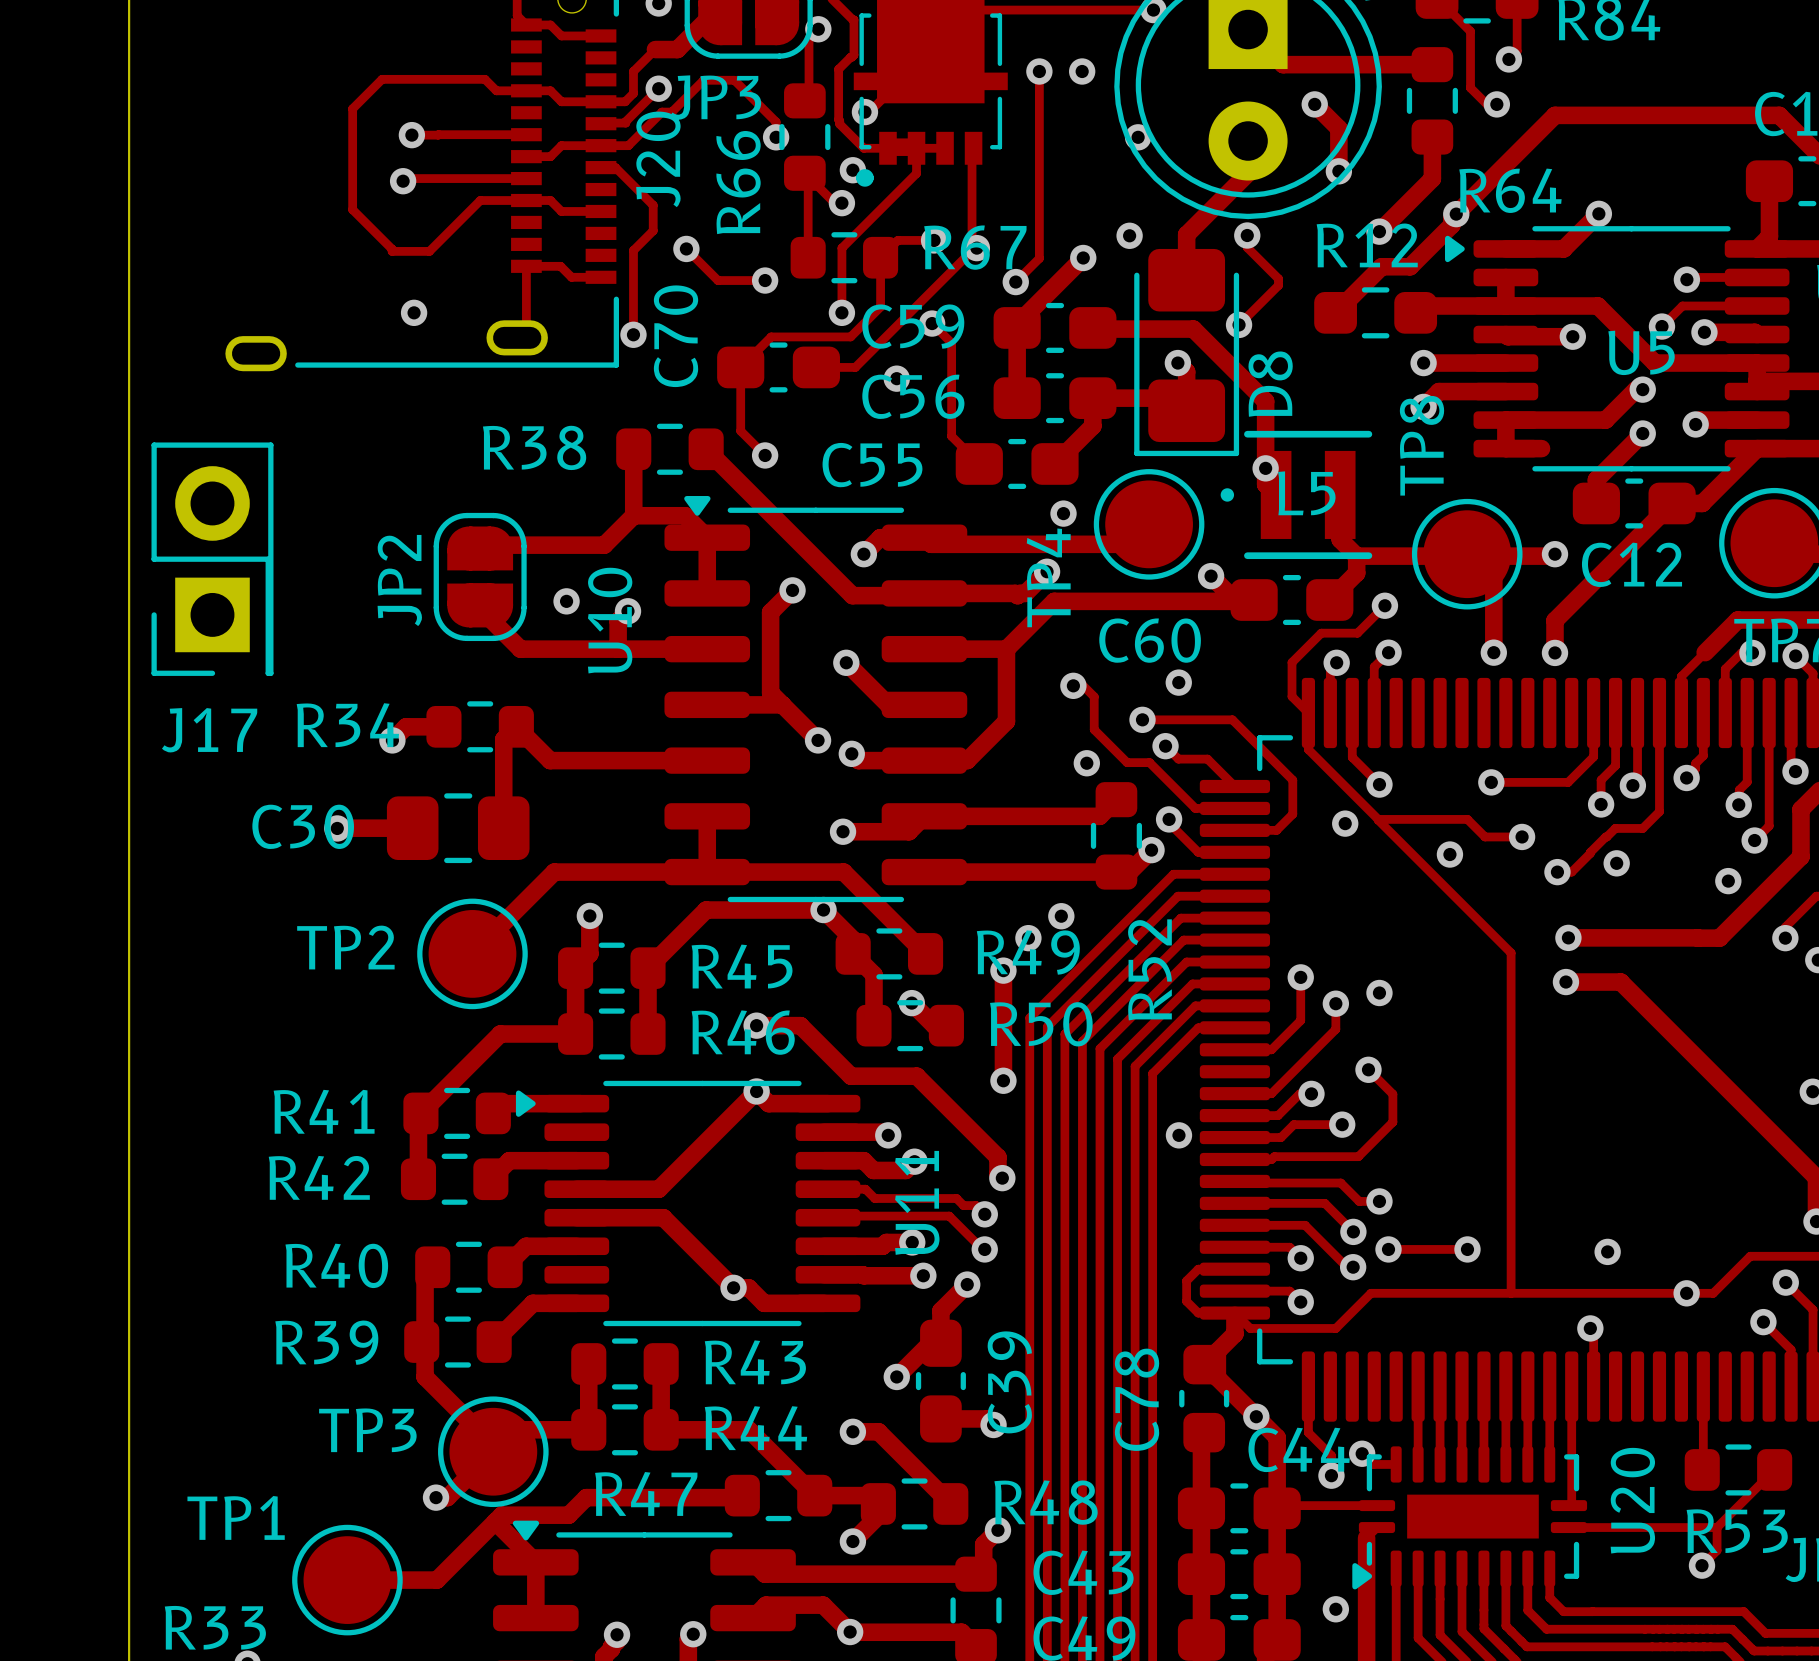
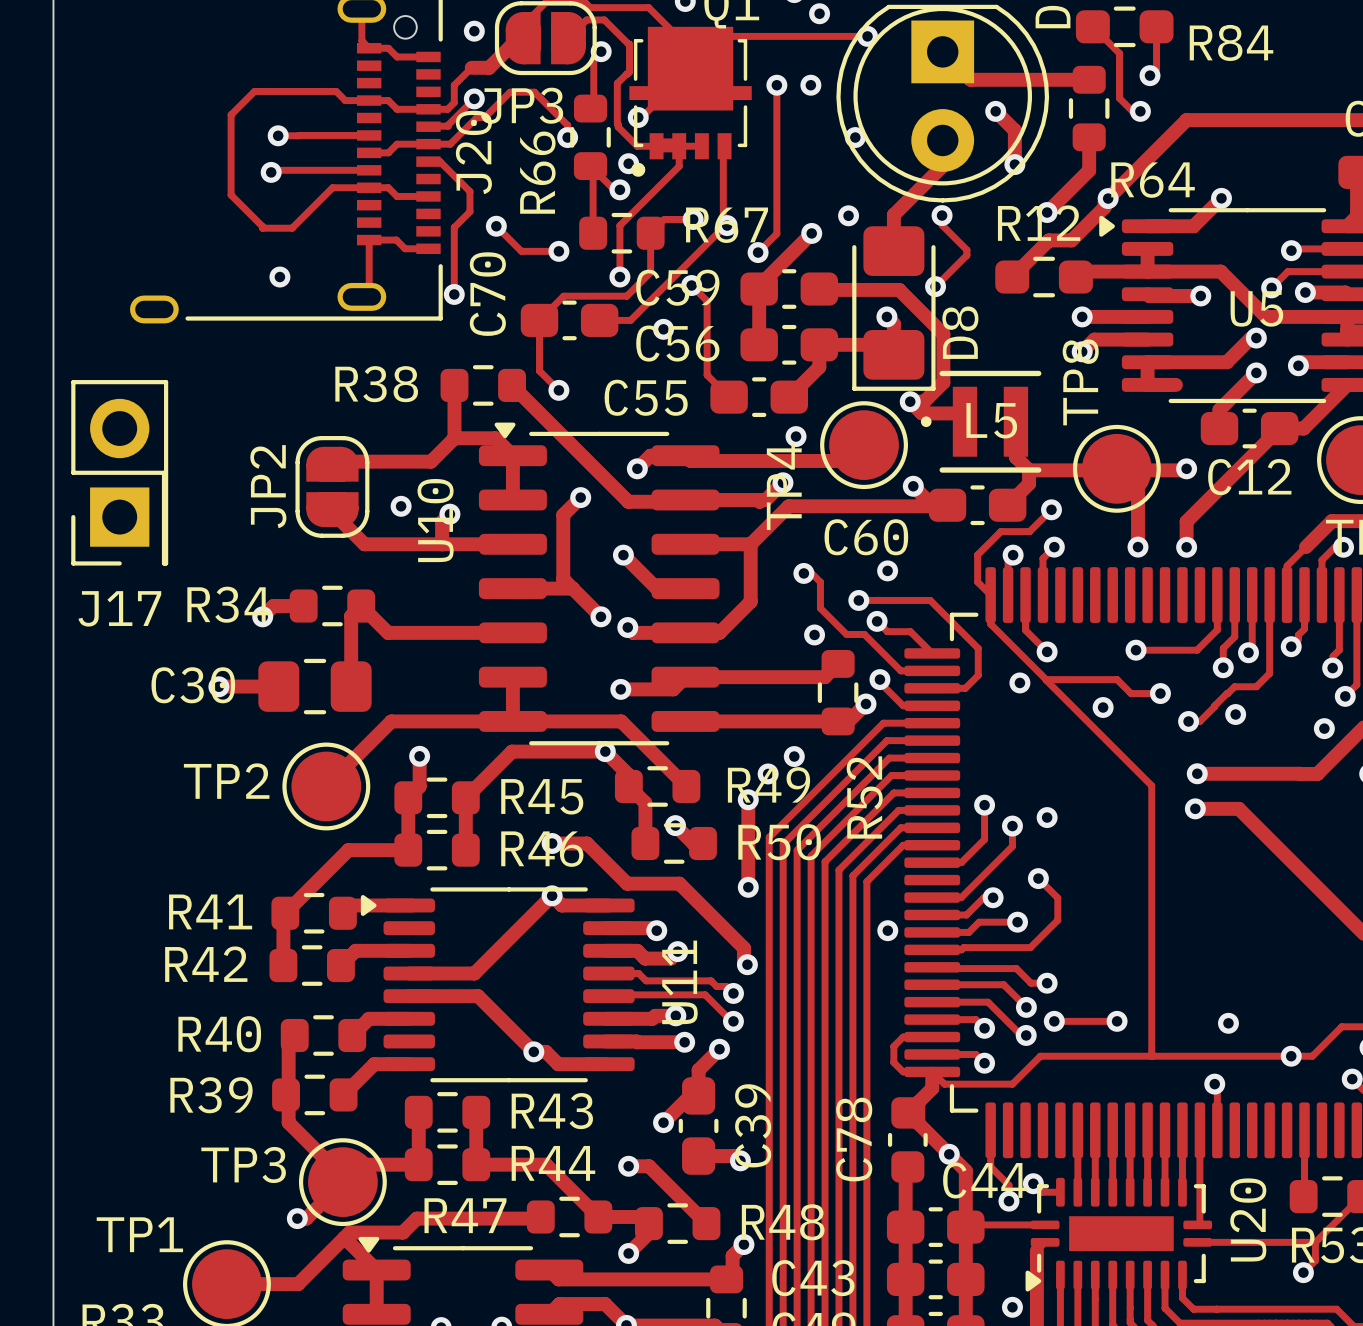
track: (1248, 384) (1265, 401) (1265, 484) -> (943, 334) (943, 382) (924, 401) (910, 401) (921, 413) (956, 413)
via position: (1265, 468) -> (910, 401)

